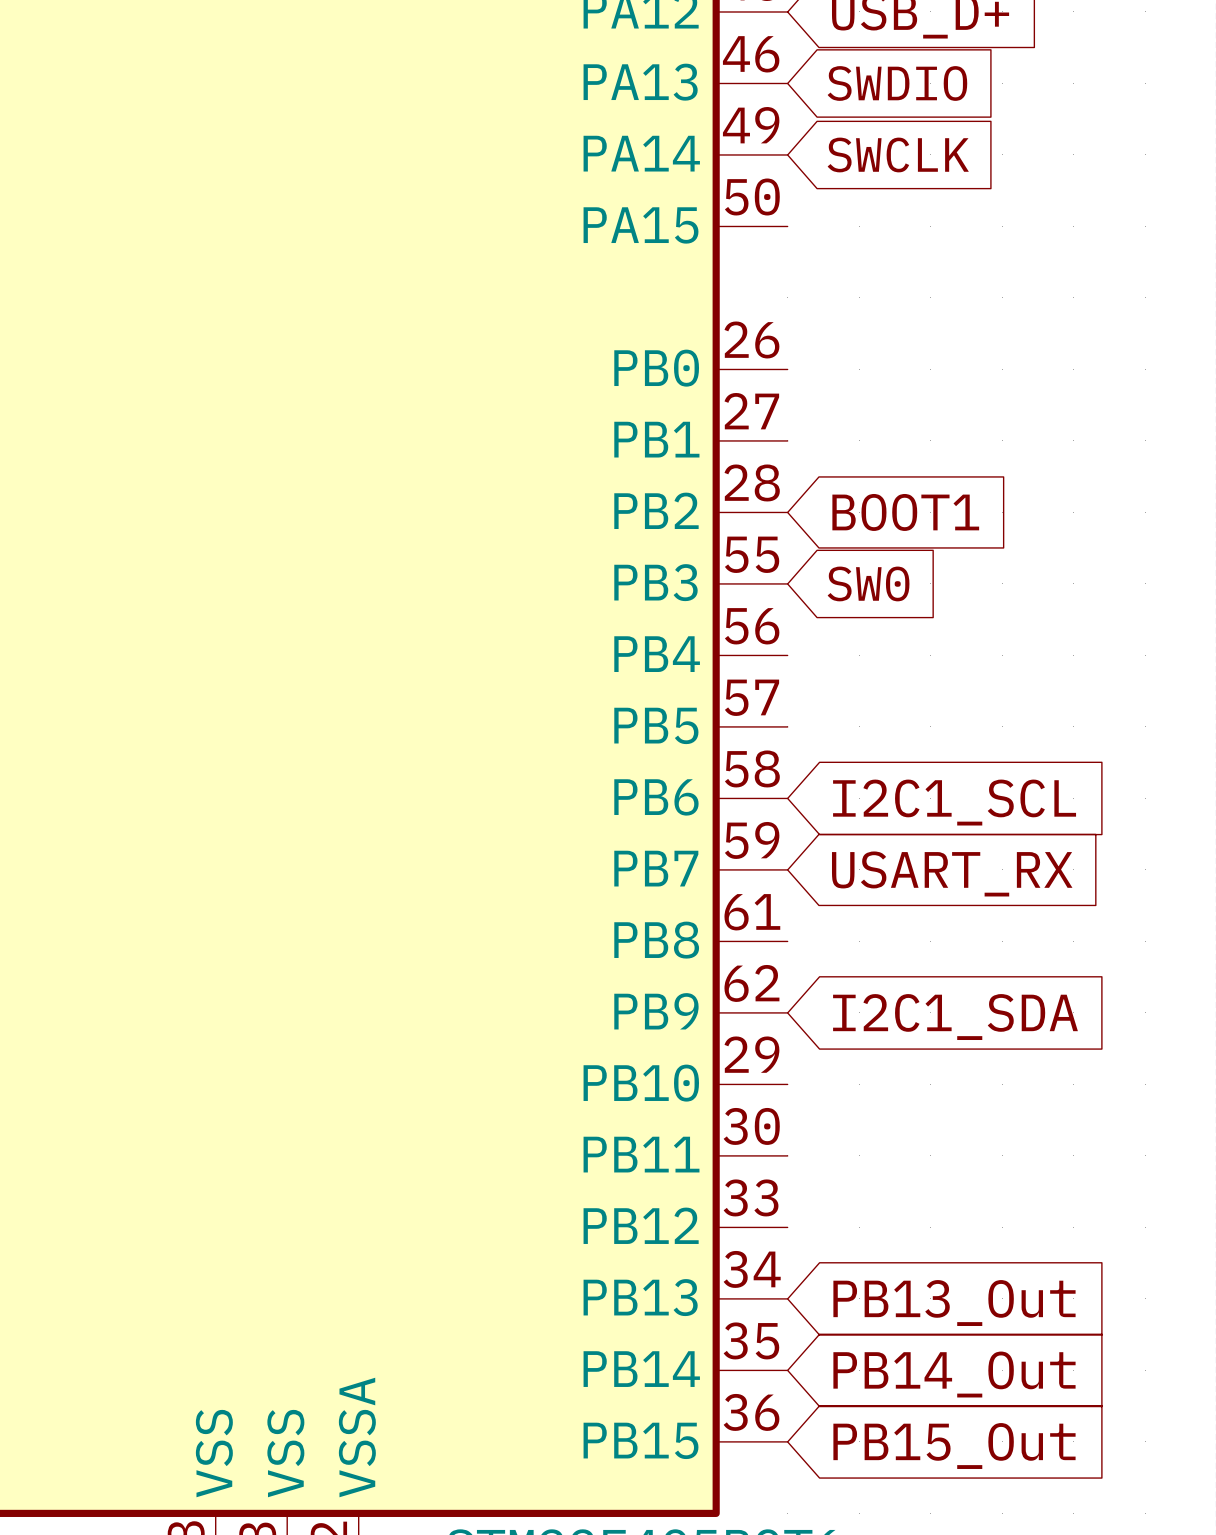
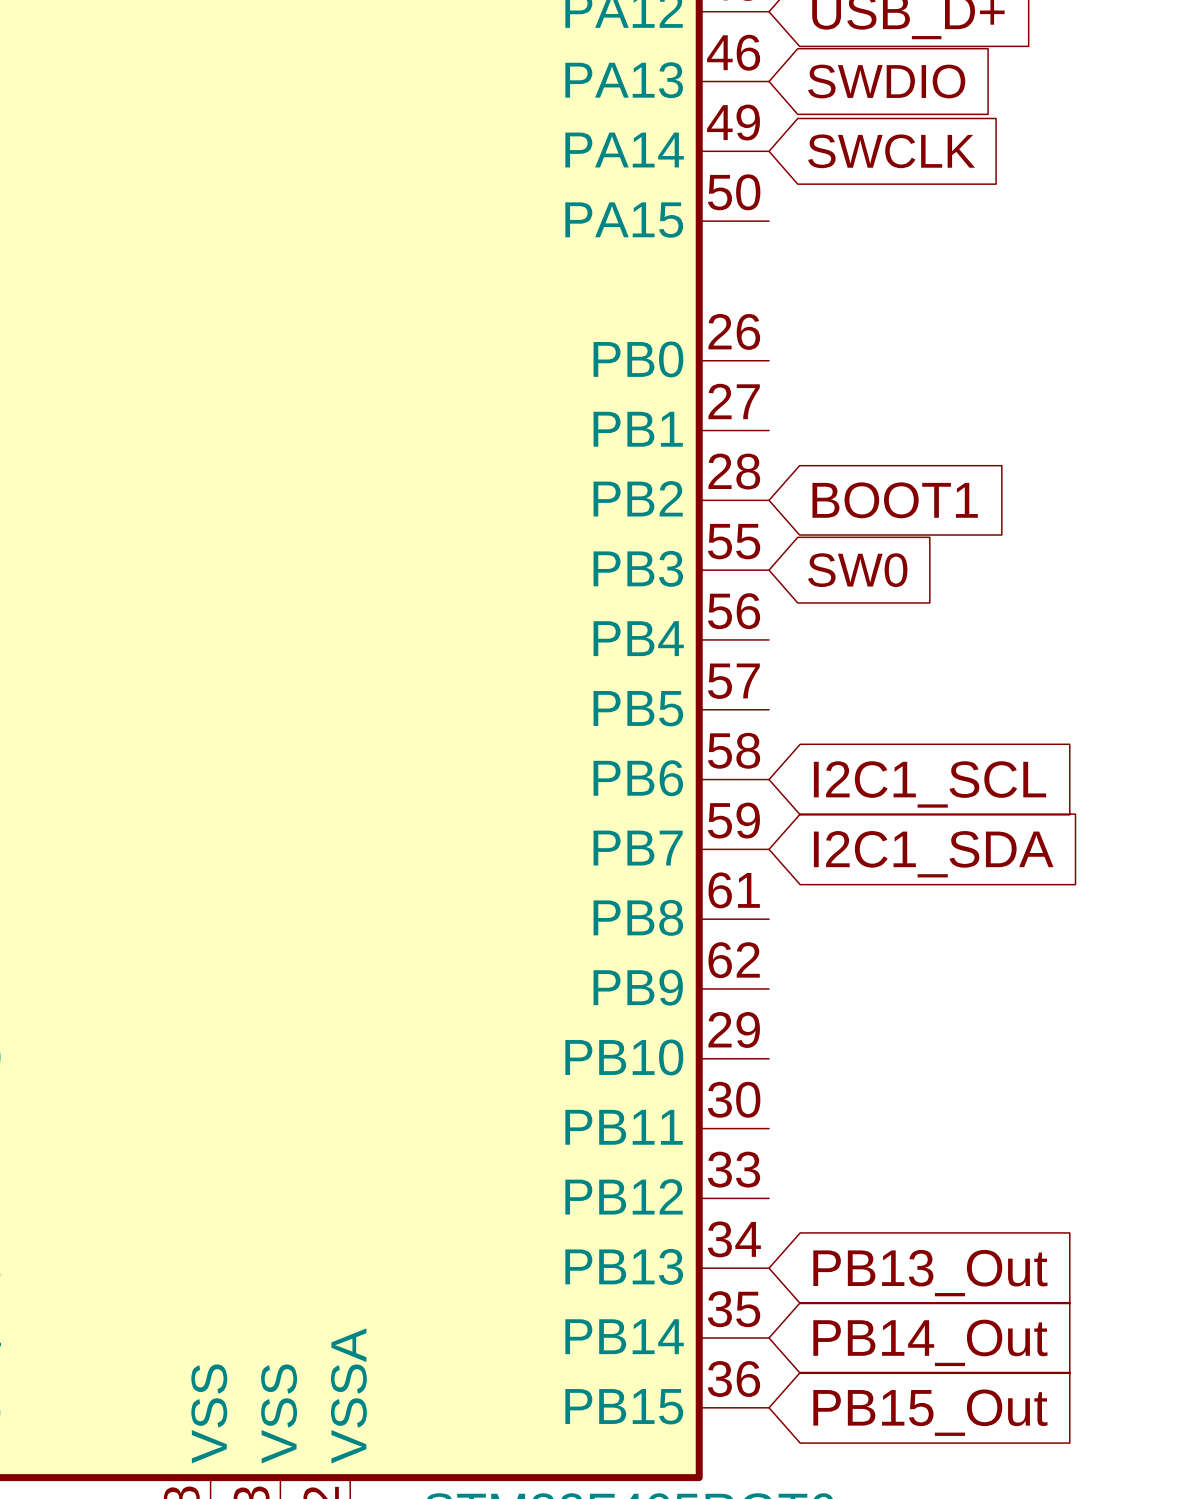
global label: USART_RX (952, 873) -> I2C1_SDA (933, 854)
global label: I2C1_SDA (955, 1017) -> none

